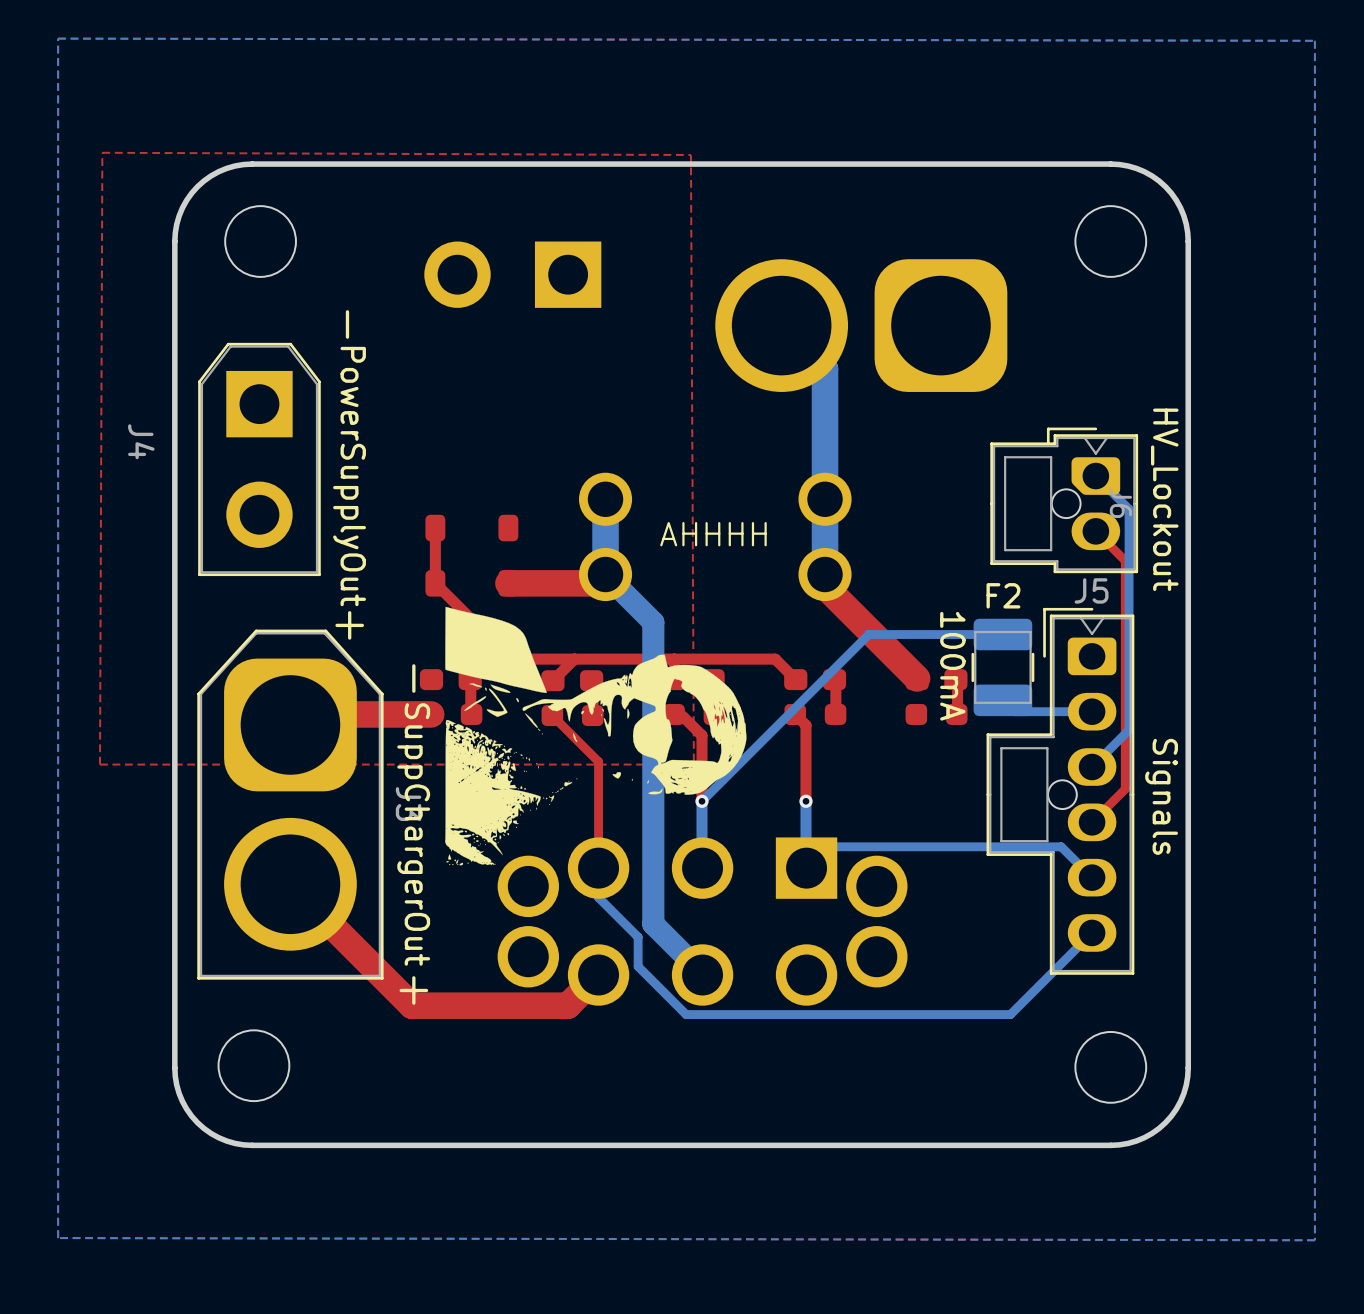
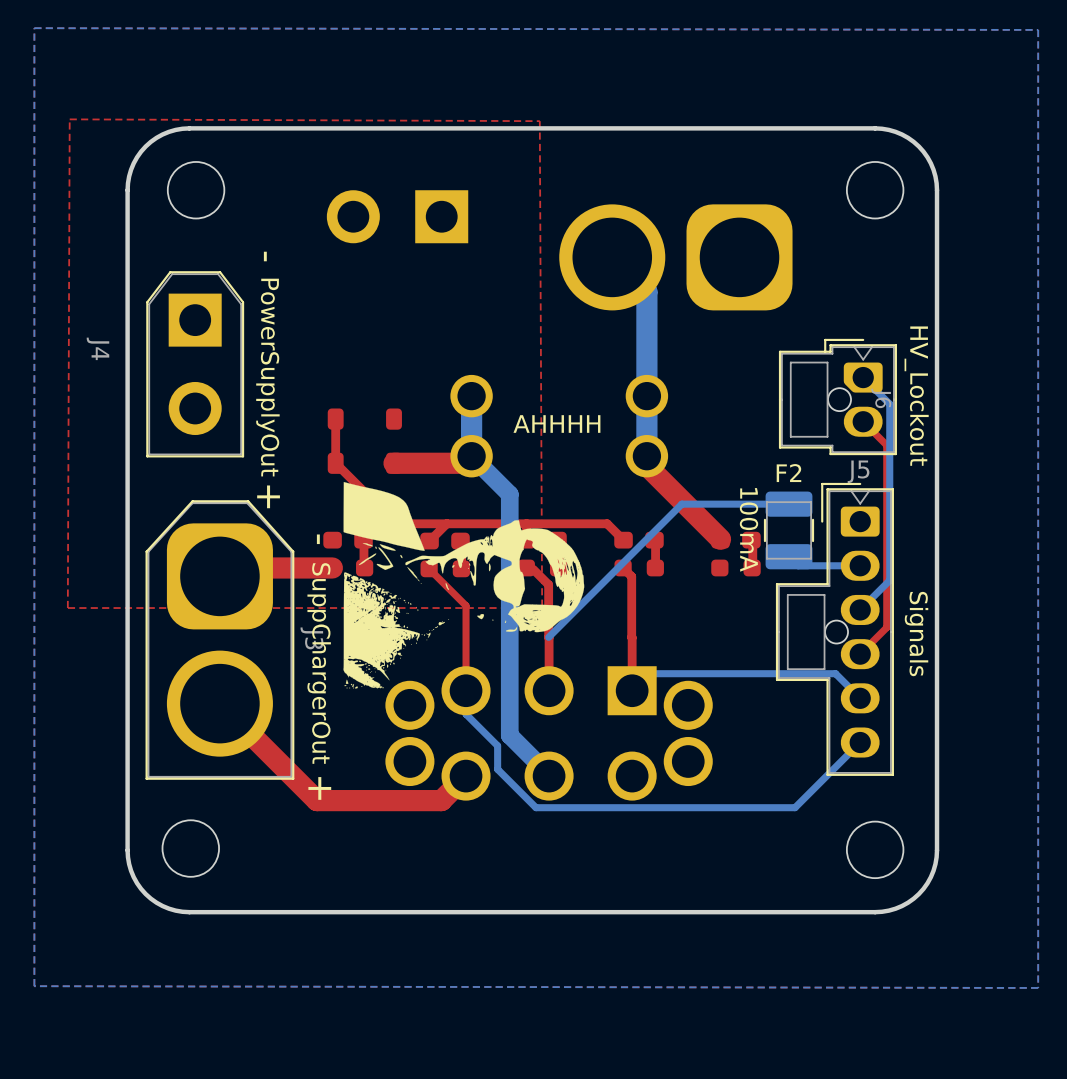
top track: none -> (548, 637) (549, 690)
bottom track: (702, 801) (702, 868) -> none
via: (702, 801) -> none
top track: none -> (631, 637) (632, 690)
bottom track: (805, 801) (805, 868) -> none
via: (805, 801) -> none

